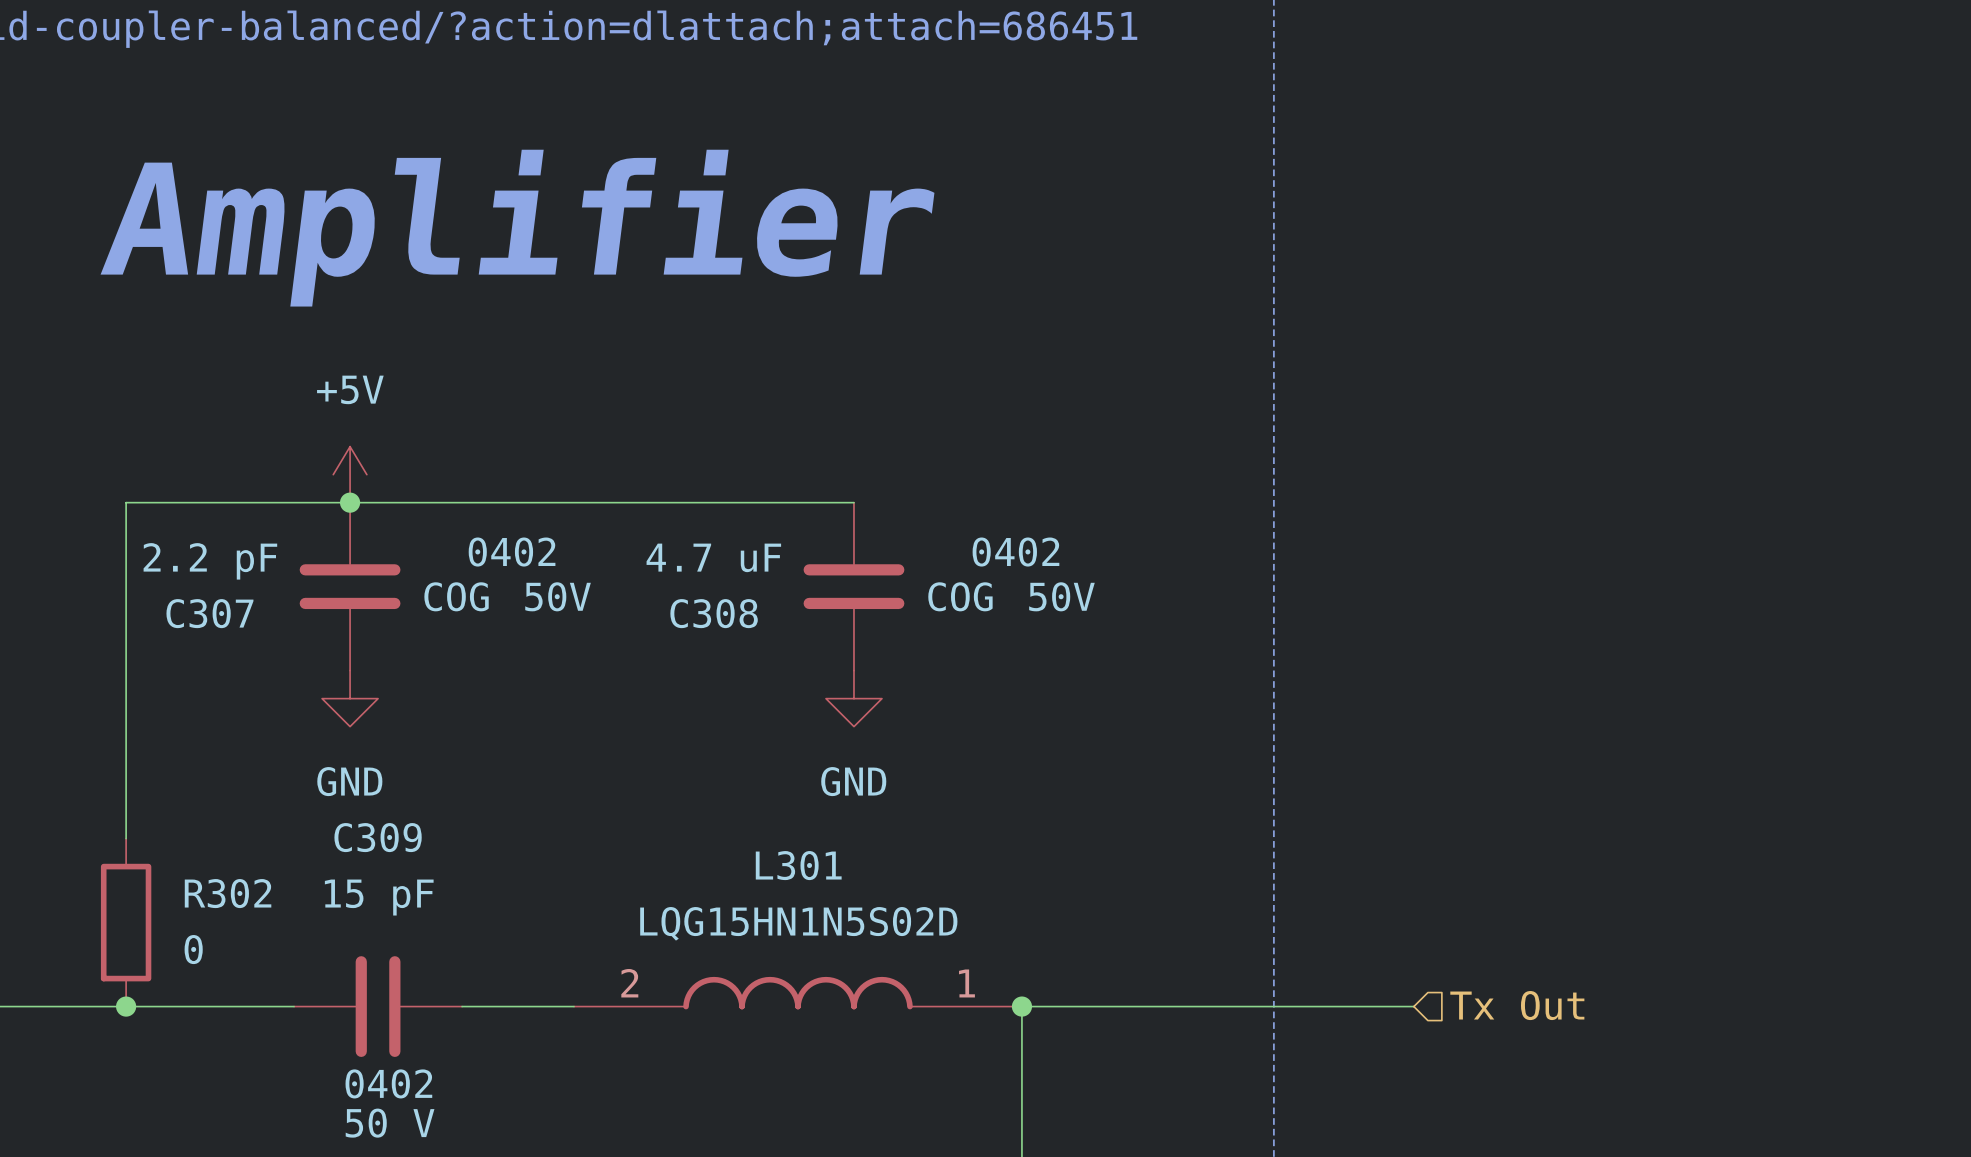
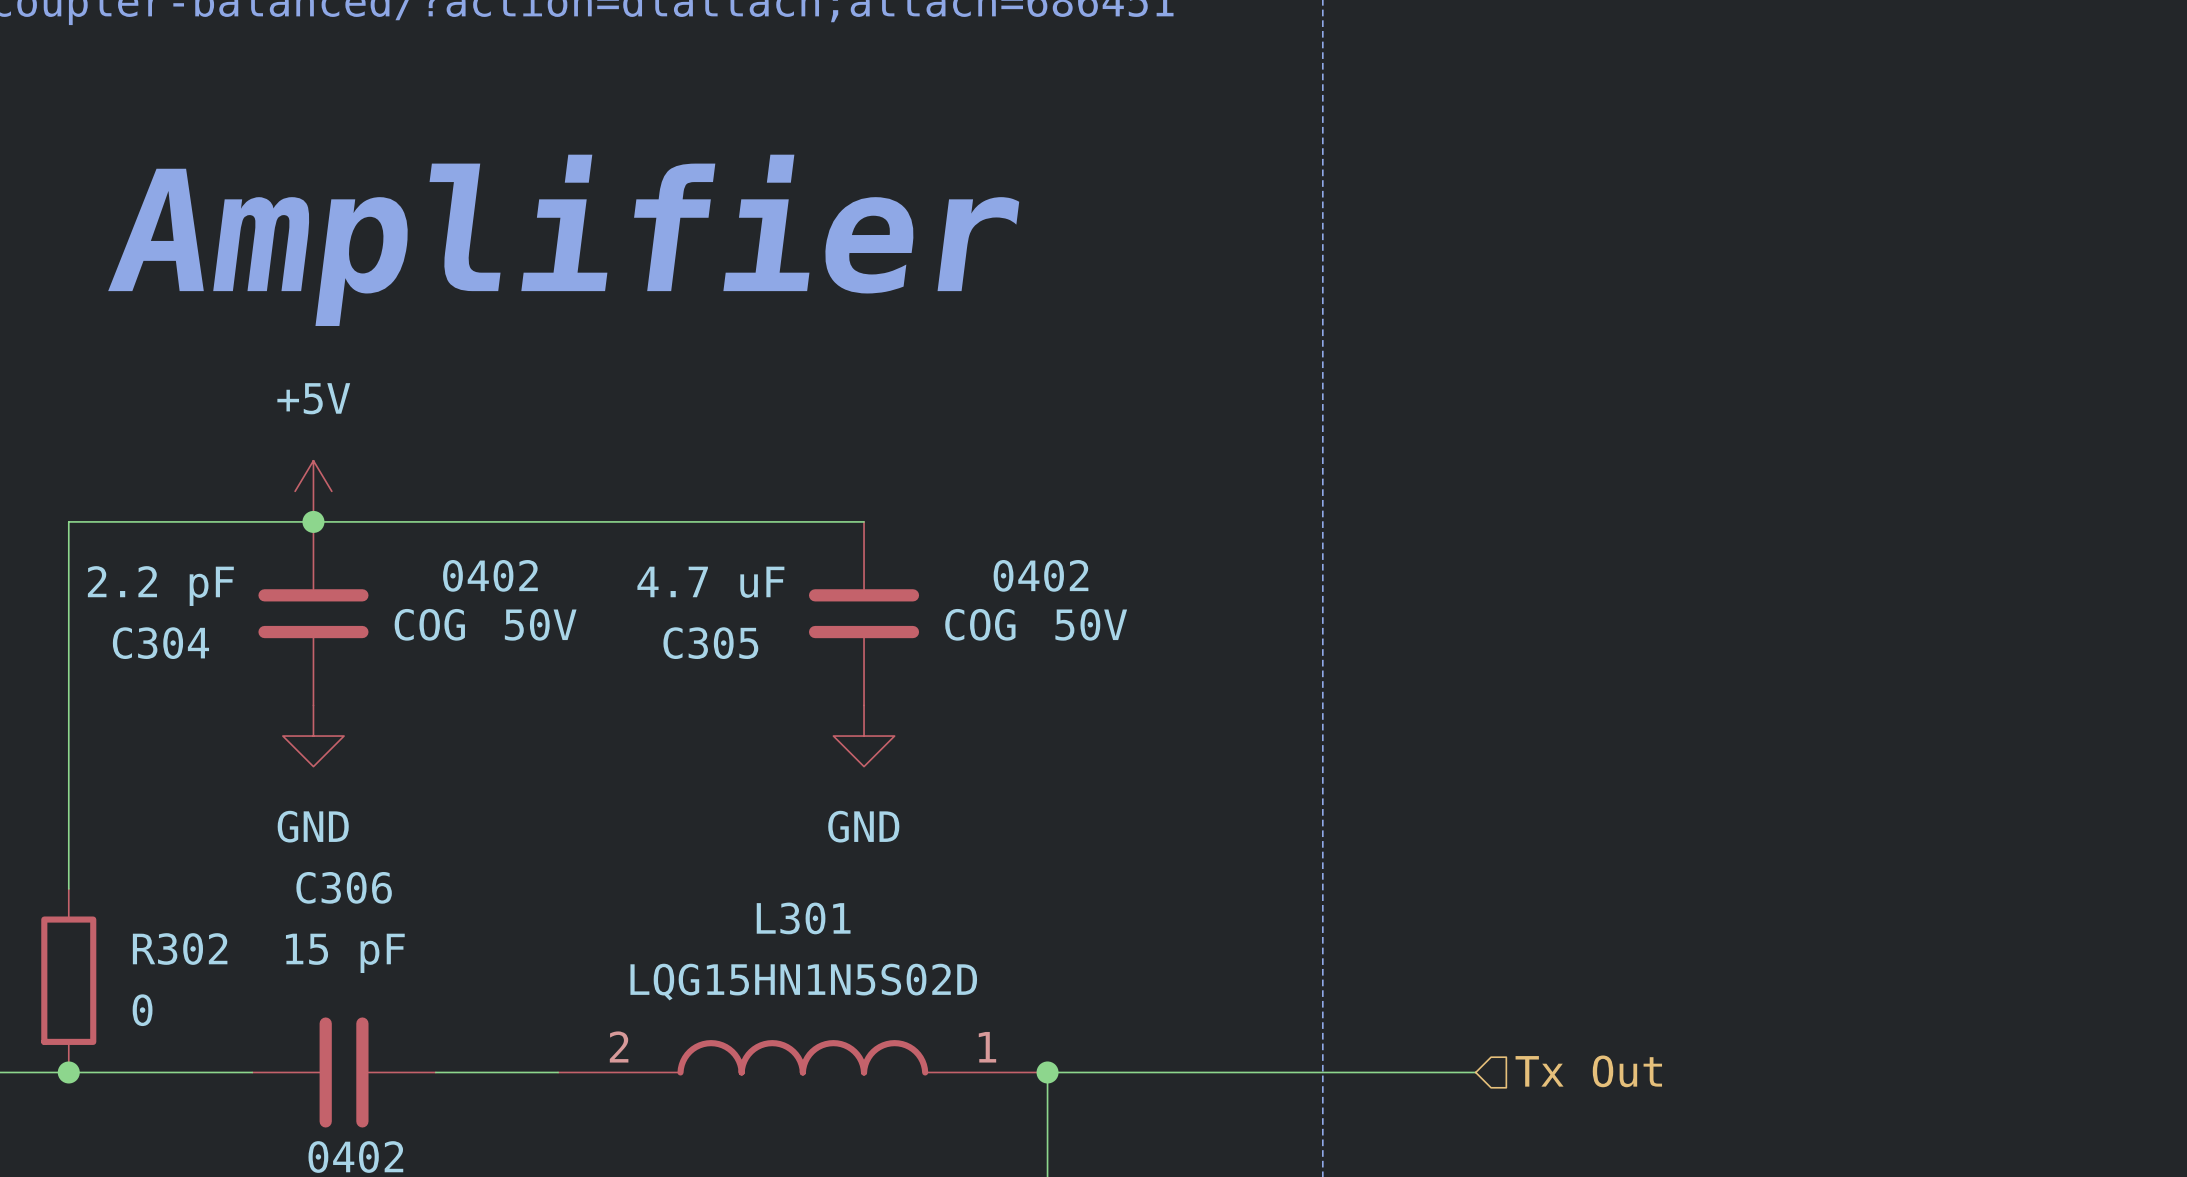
text position: Amplifier (517, 228) -> Amplifier (563, 240)
C307 name: C307 (209, 613) -> C304 (160, 643)
C308 name: C308 (714, 613) -> C305 (710, 643)
C309 name: C309 (378, 837) -> C306 (344, 887)

